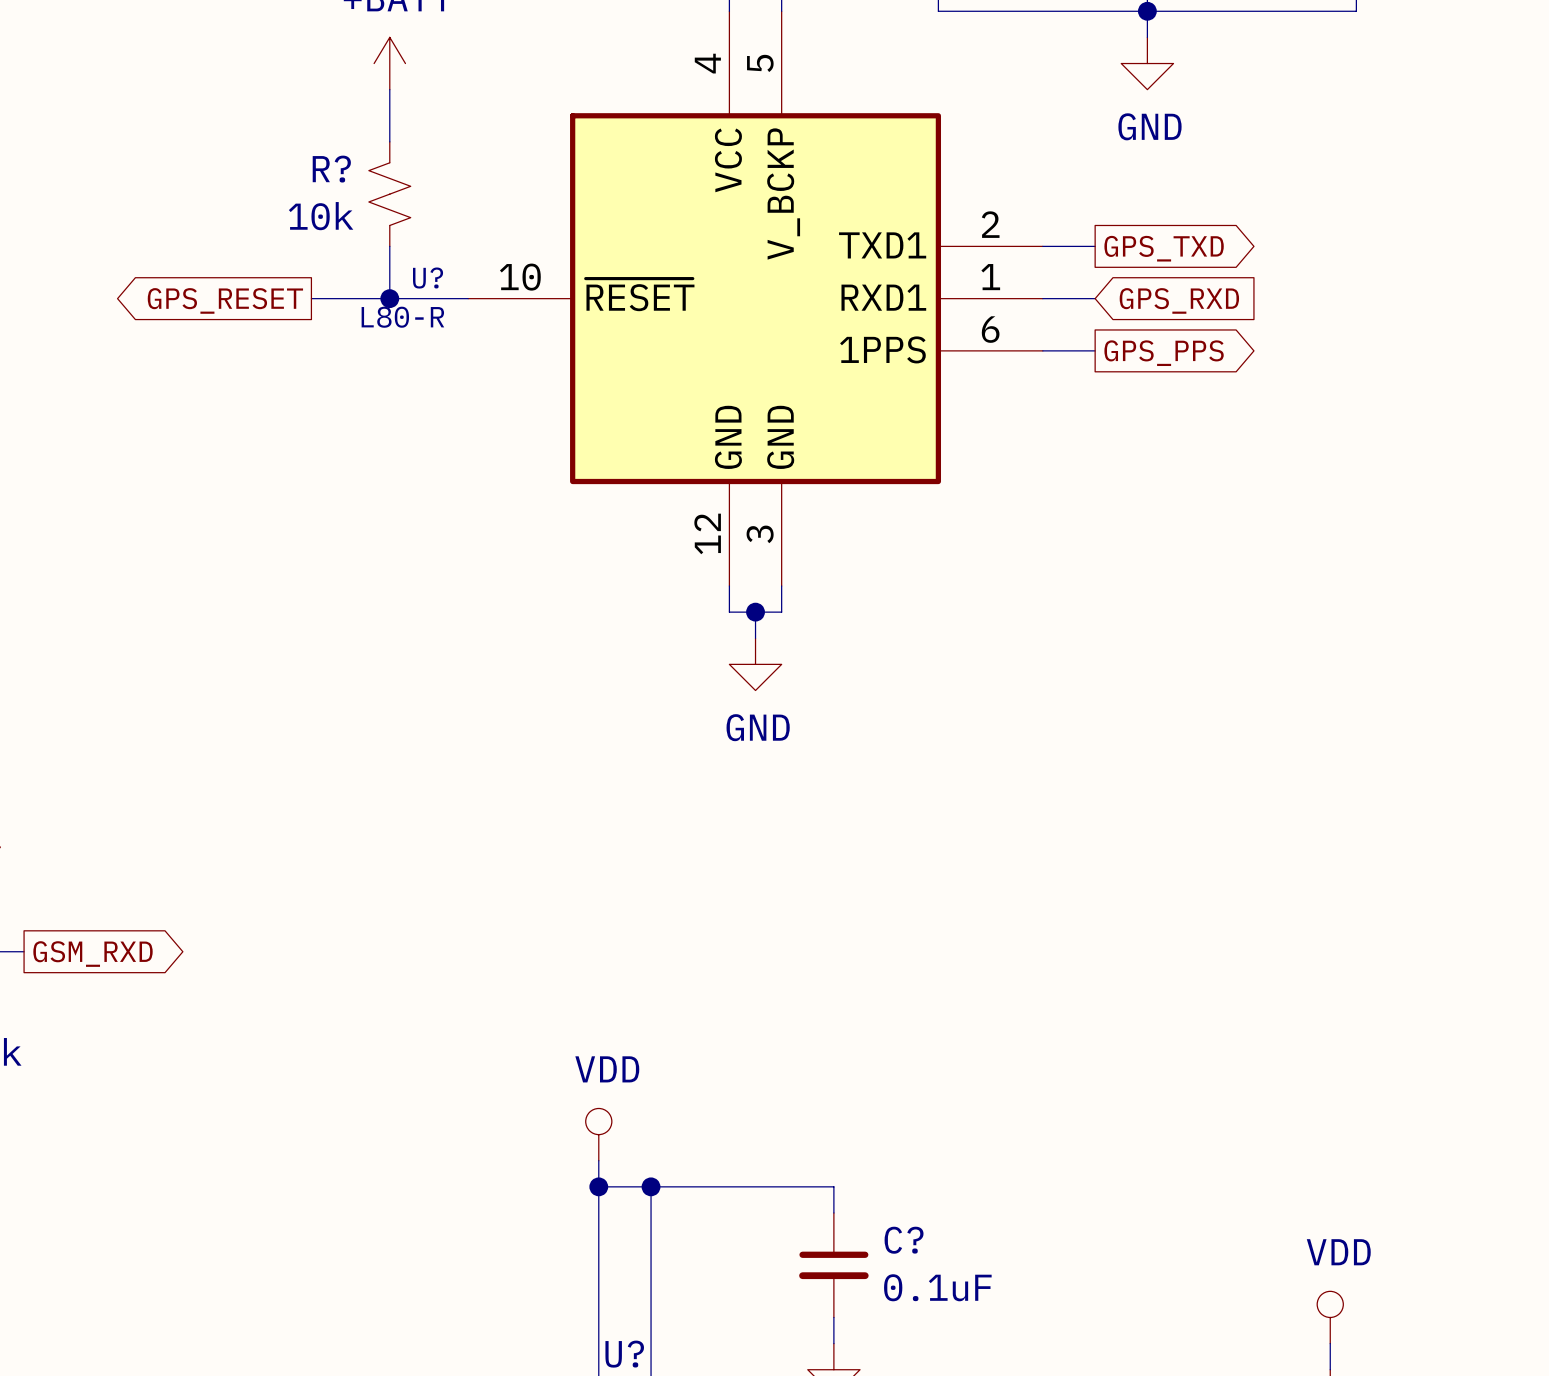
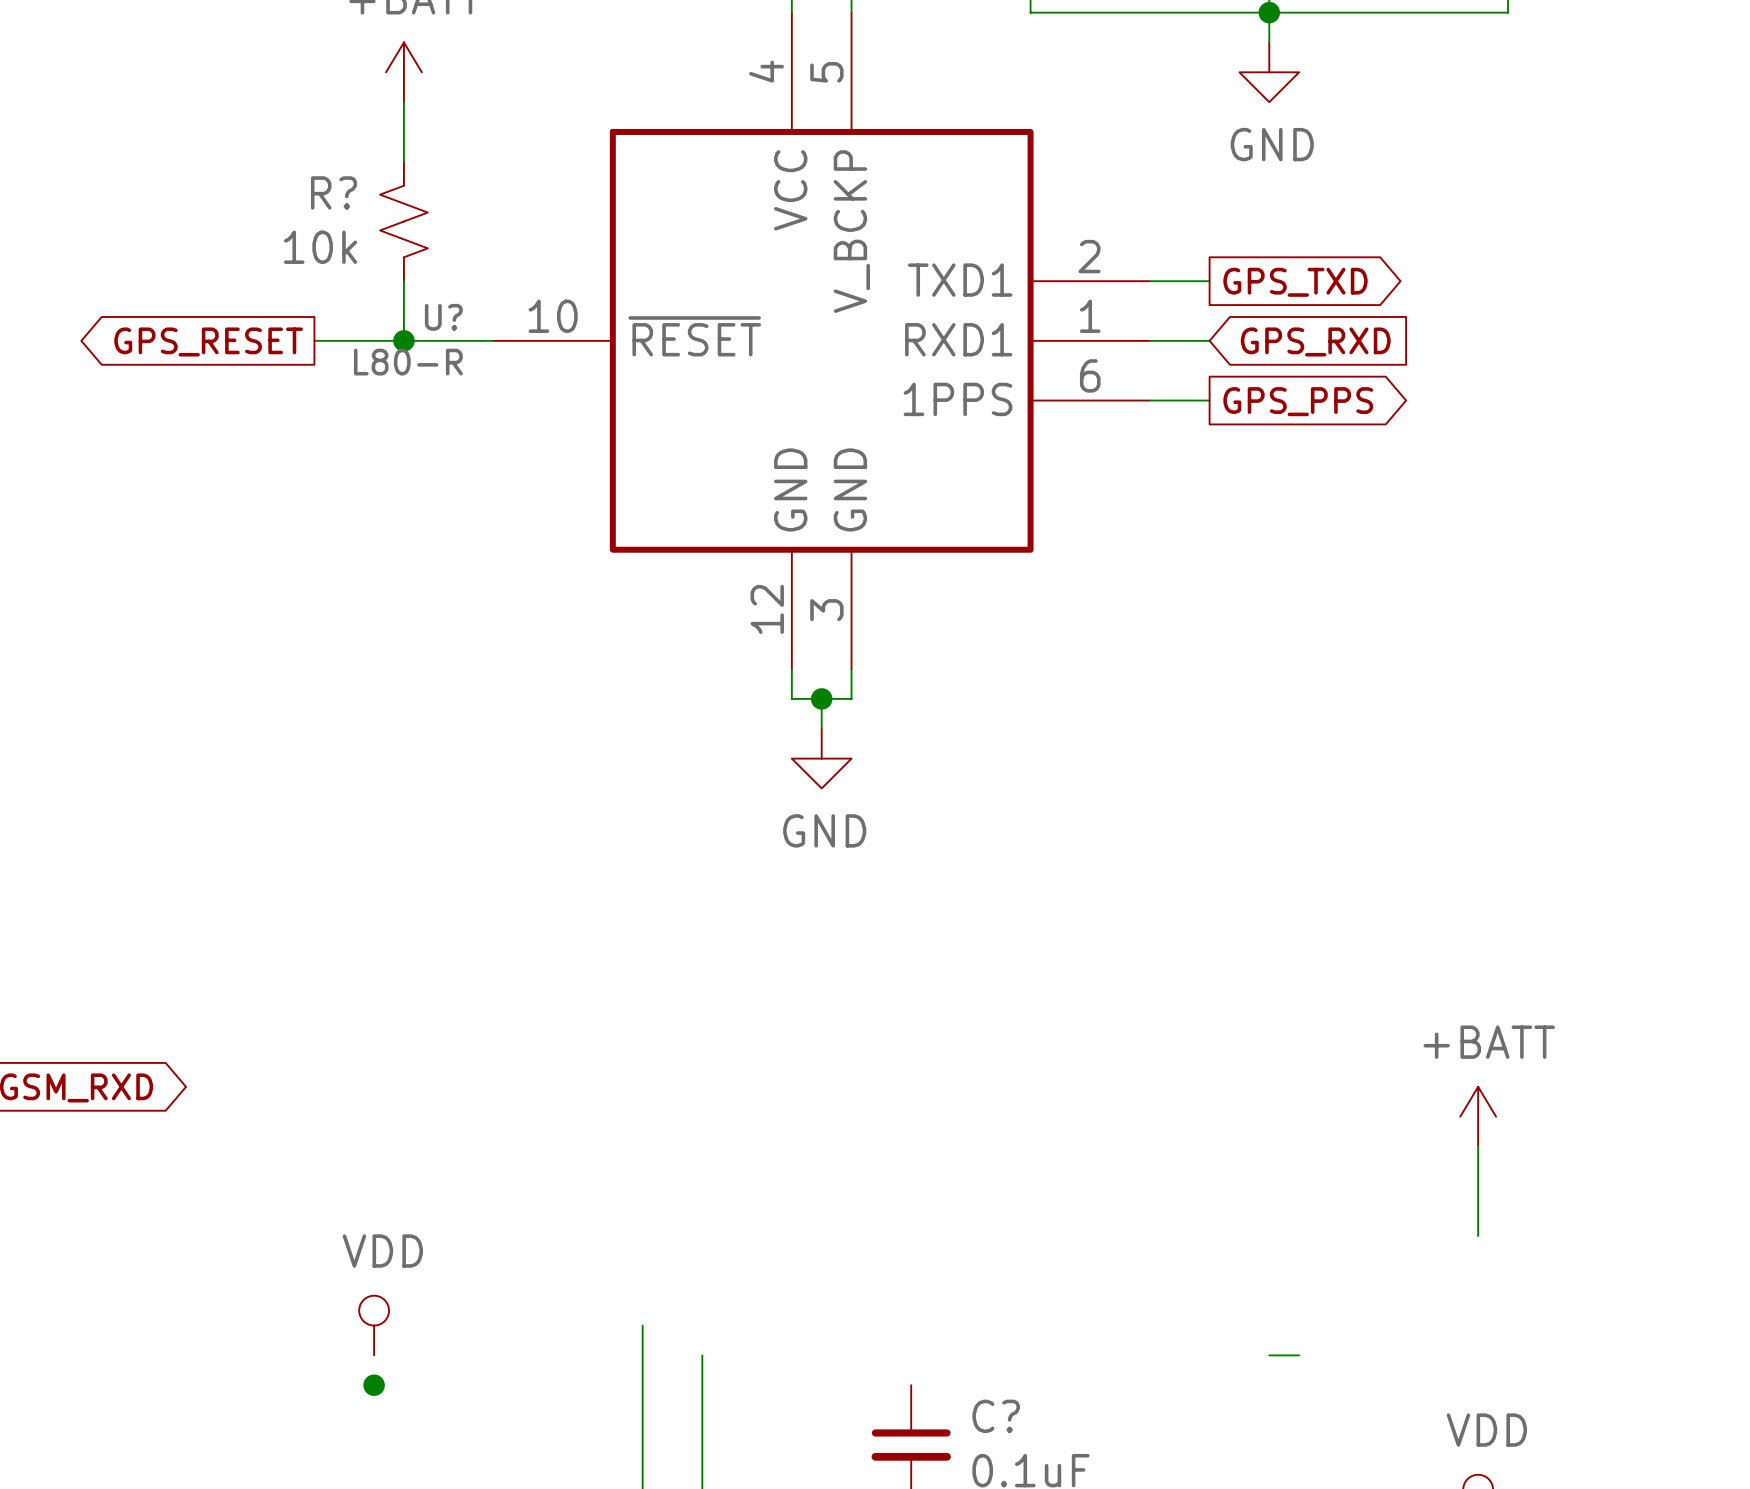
power symbol: none -> +BATT (1478, 1116)
wire: none -> (1478, 1146) (1478, 1236)
power symbol position: VDD (598, 1134) -> VDD (374, 1325)
wire: (598, 1186) (833, 1186) (833, 1212) -> none
junction: (598, 1186) -> none
junction: (651, 1186) -> none
wire: none -> (1269, 1355) (1299, 1355)
junction: none -> (374, 1385)

